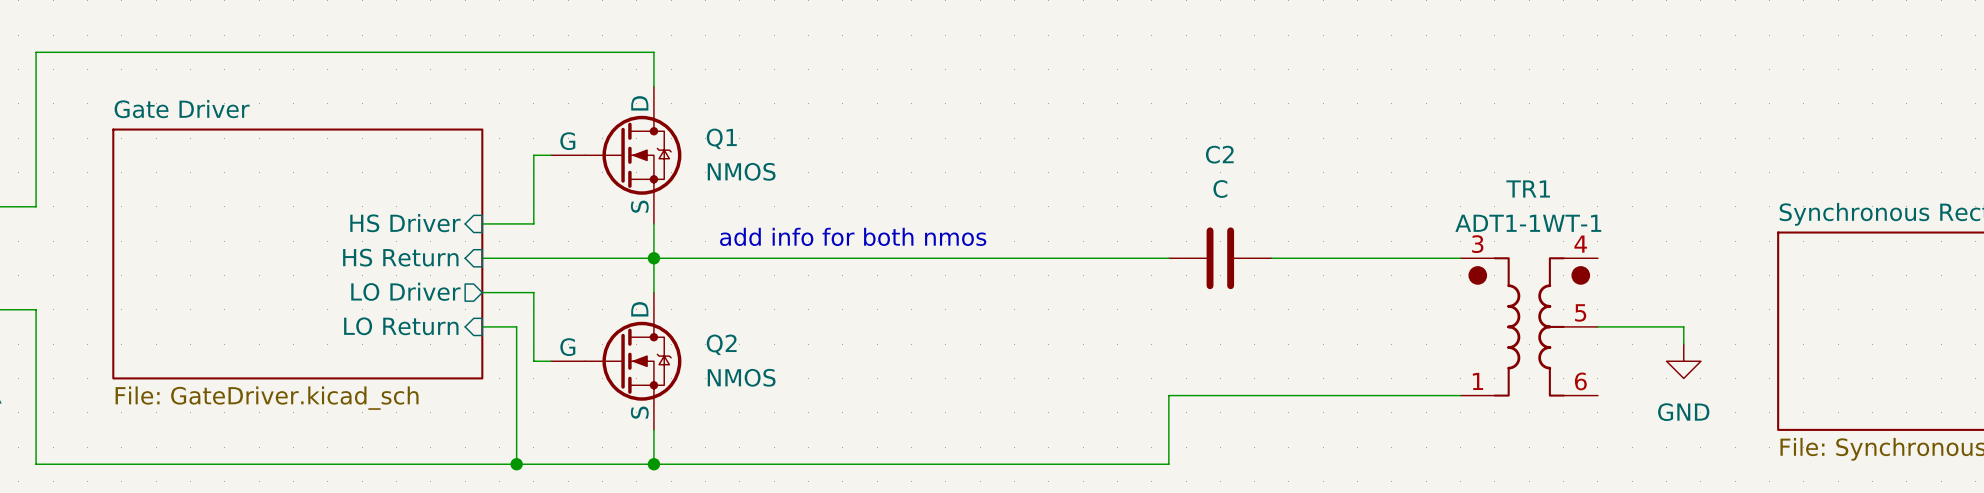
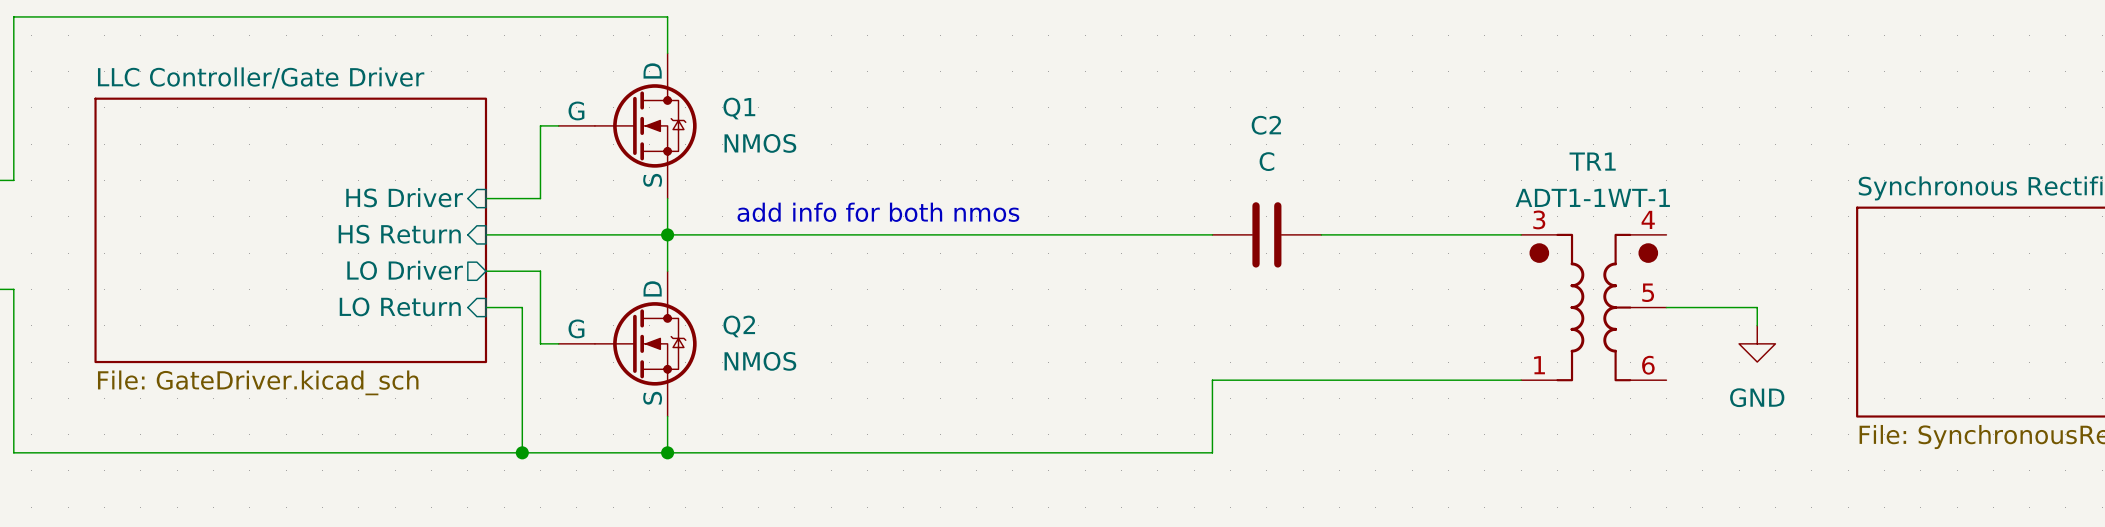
sheet Gate Driver name: Gate Driver (182, 109) -> LLC Controller/Gate Driver (261, 77)

